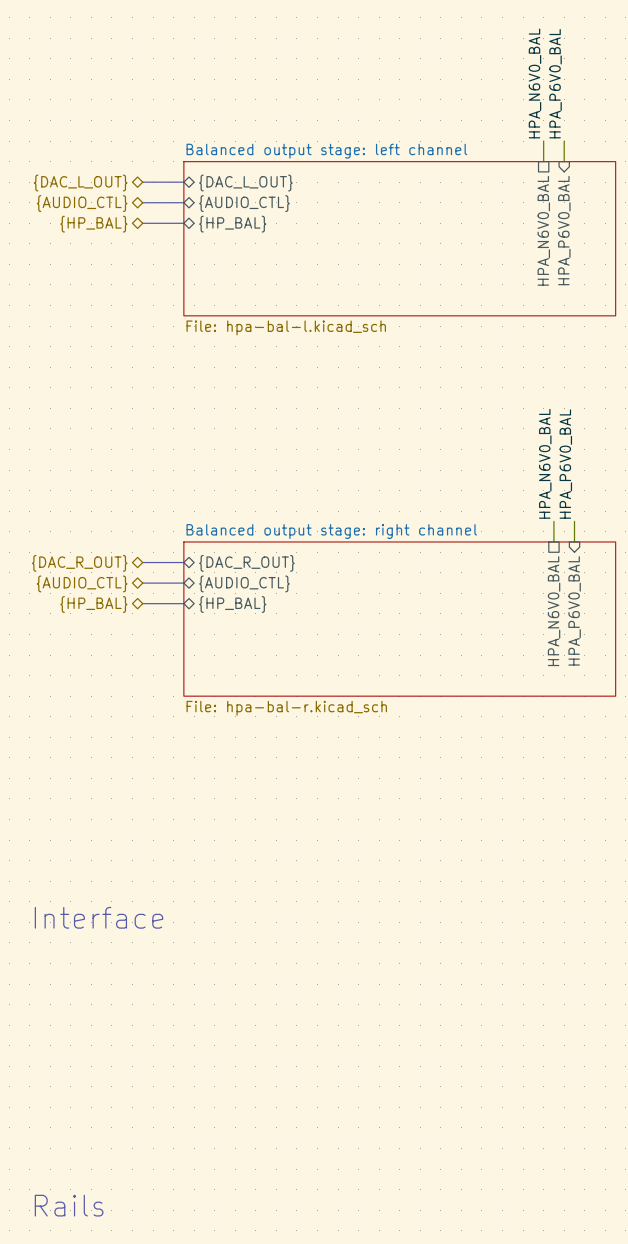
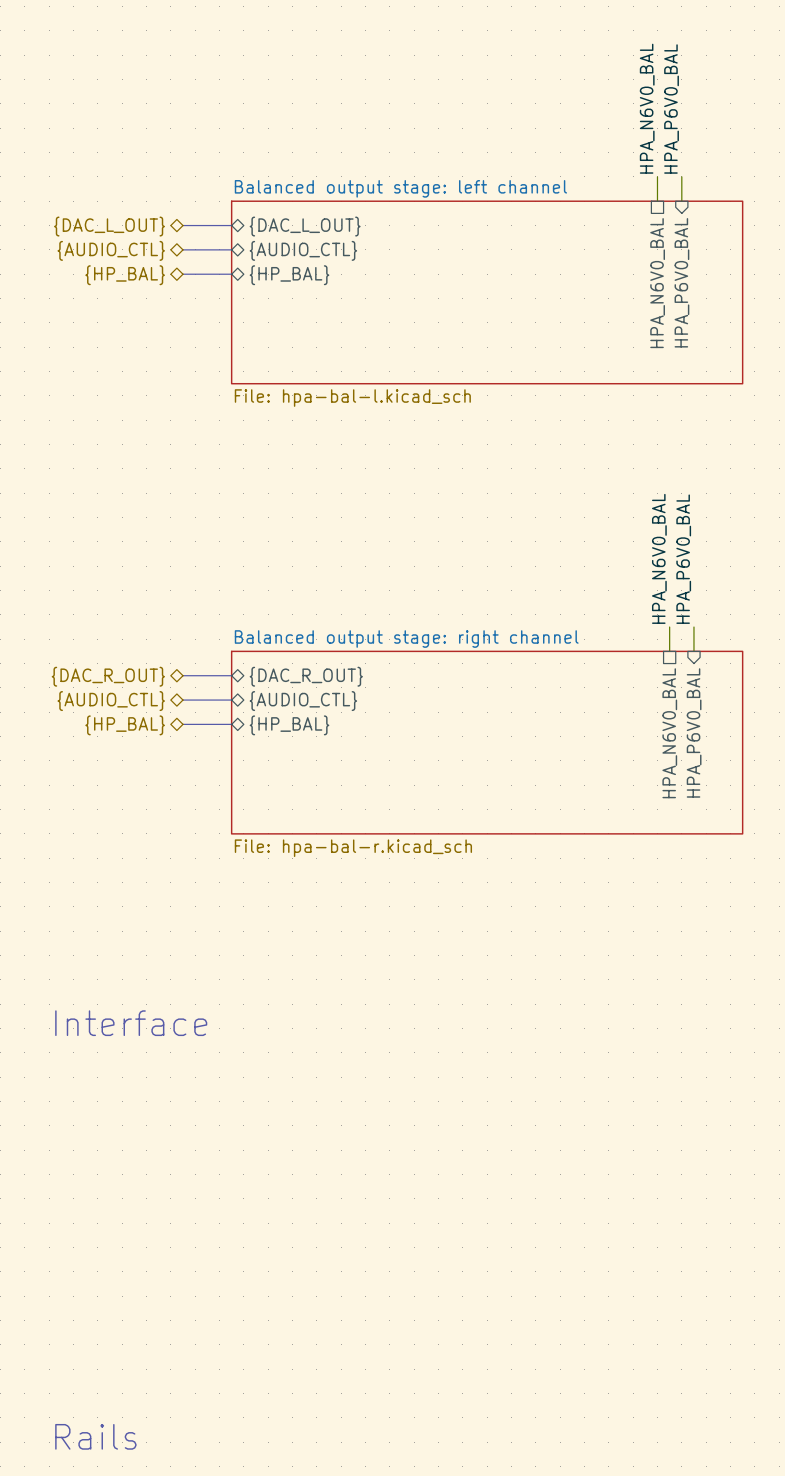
text position: Interface (99, 917) -> Interface (131, 1023)

